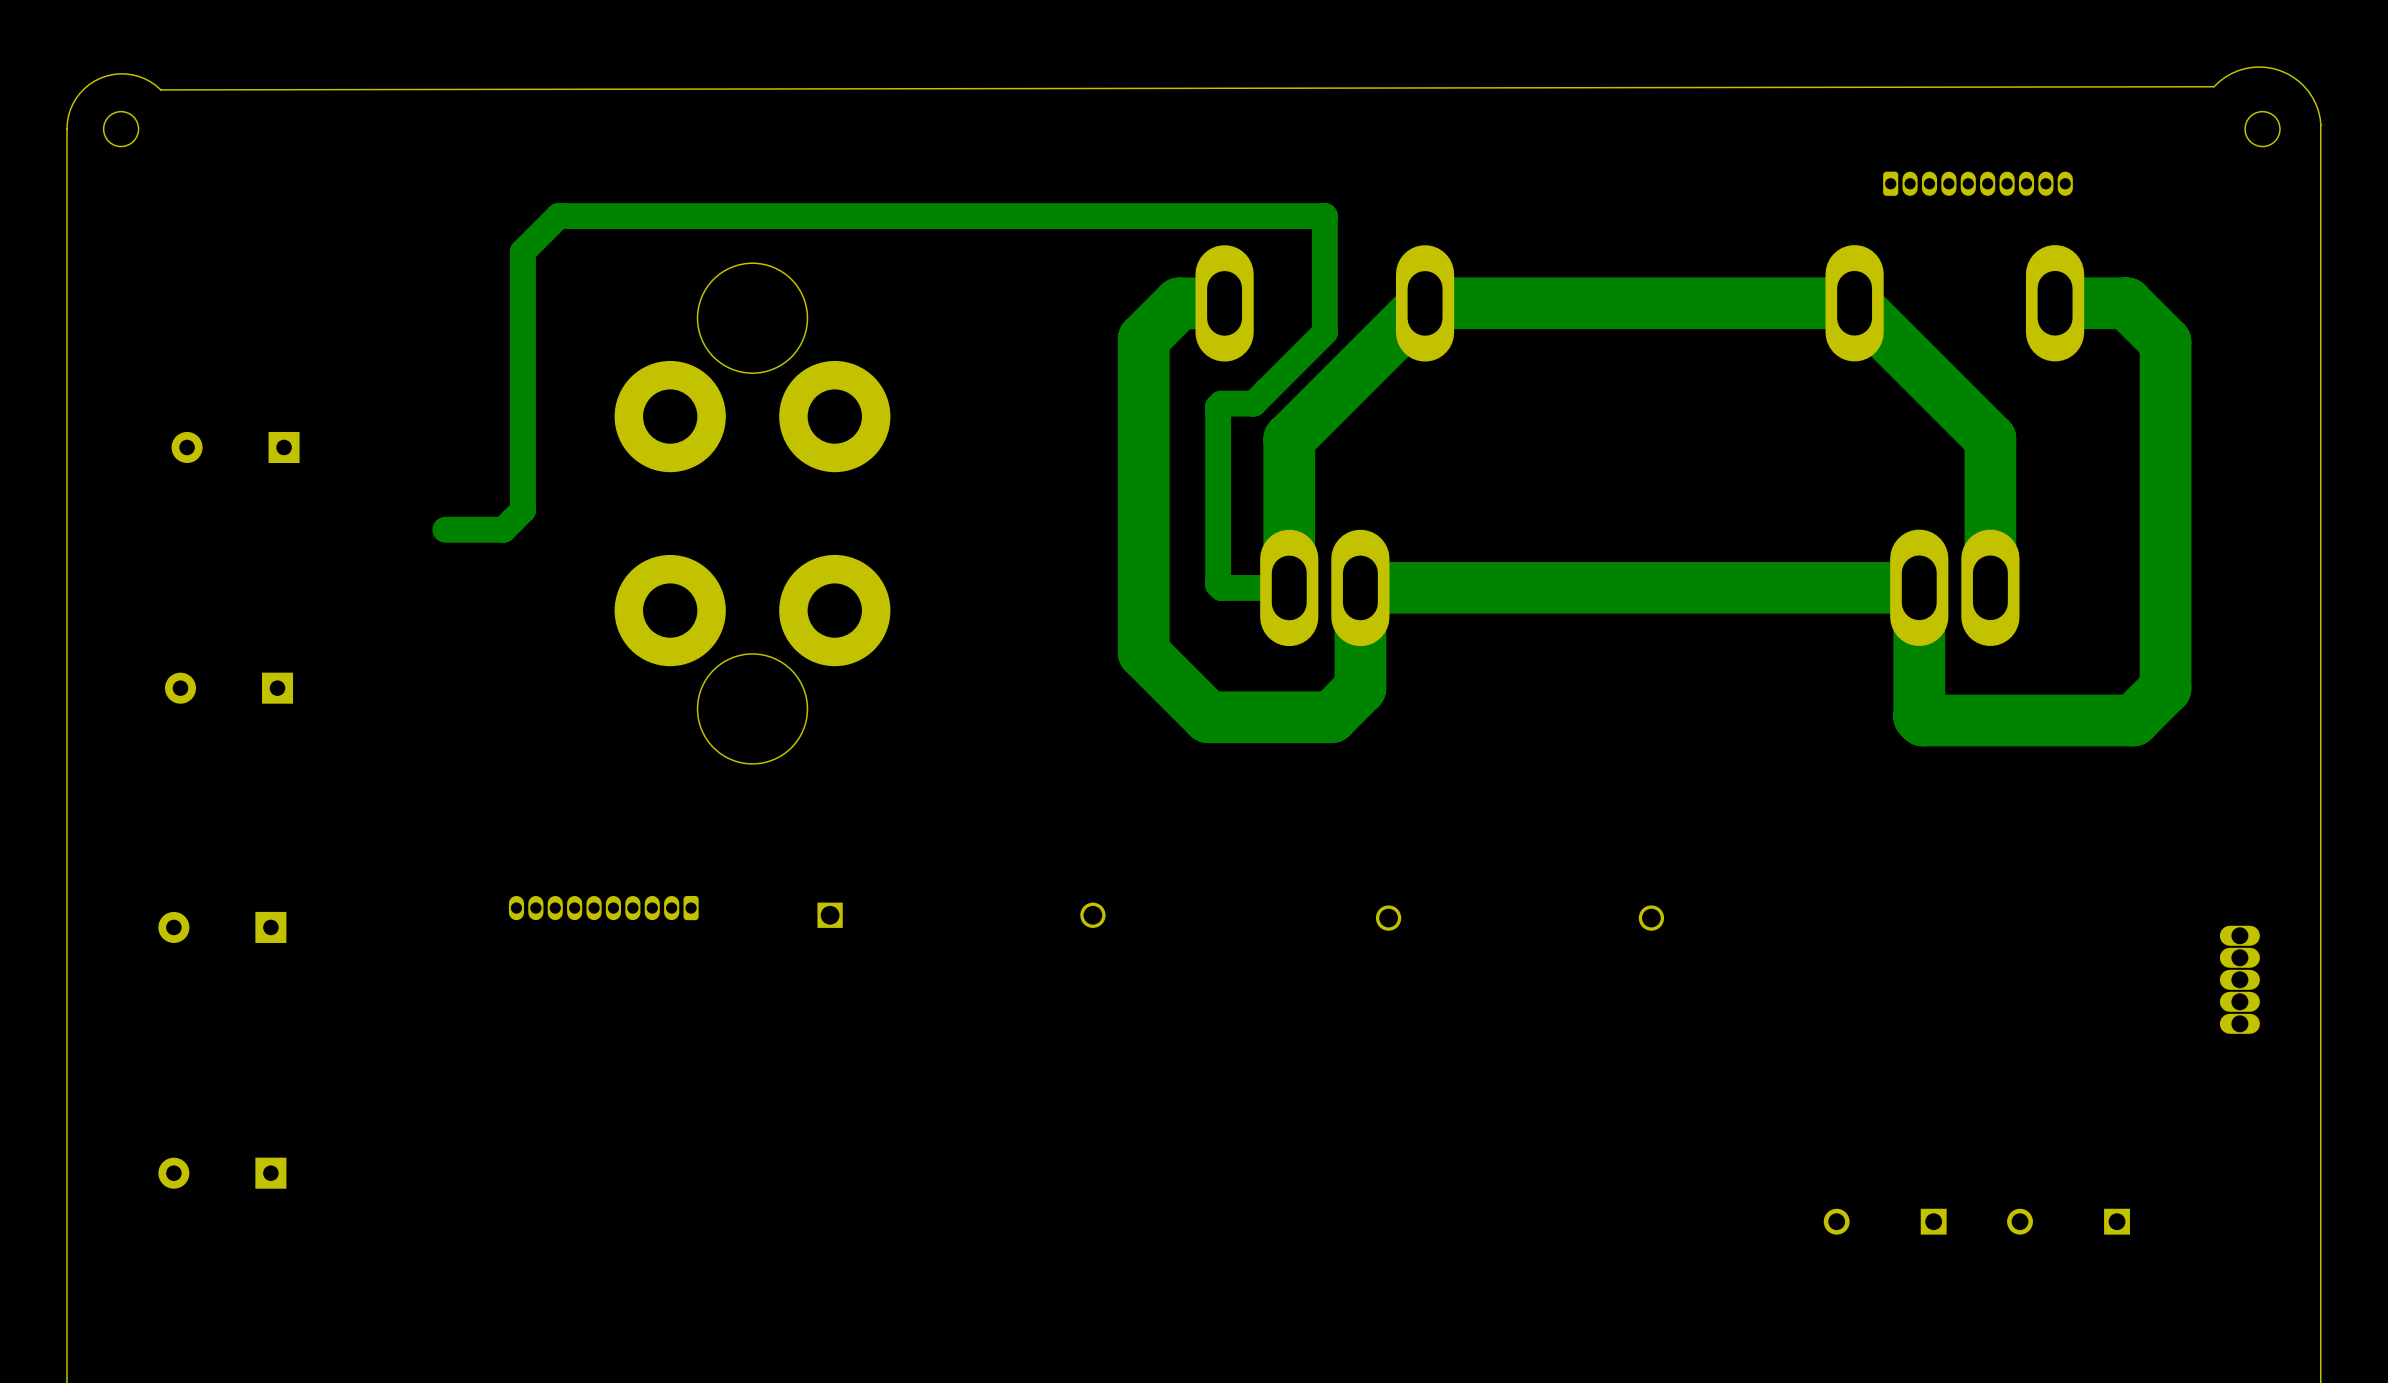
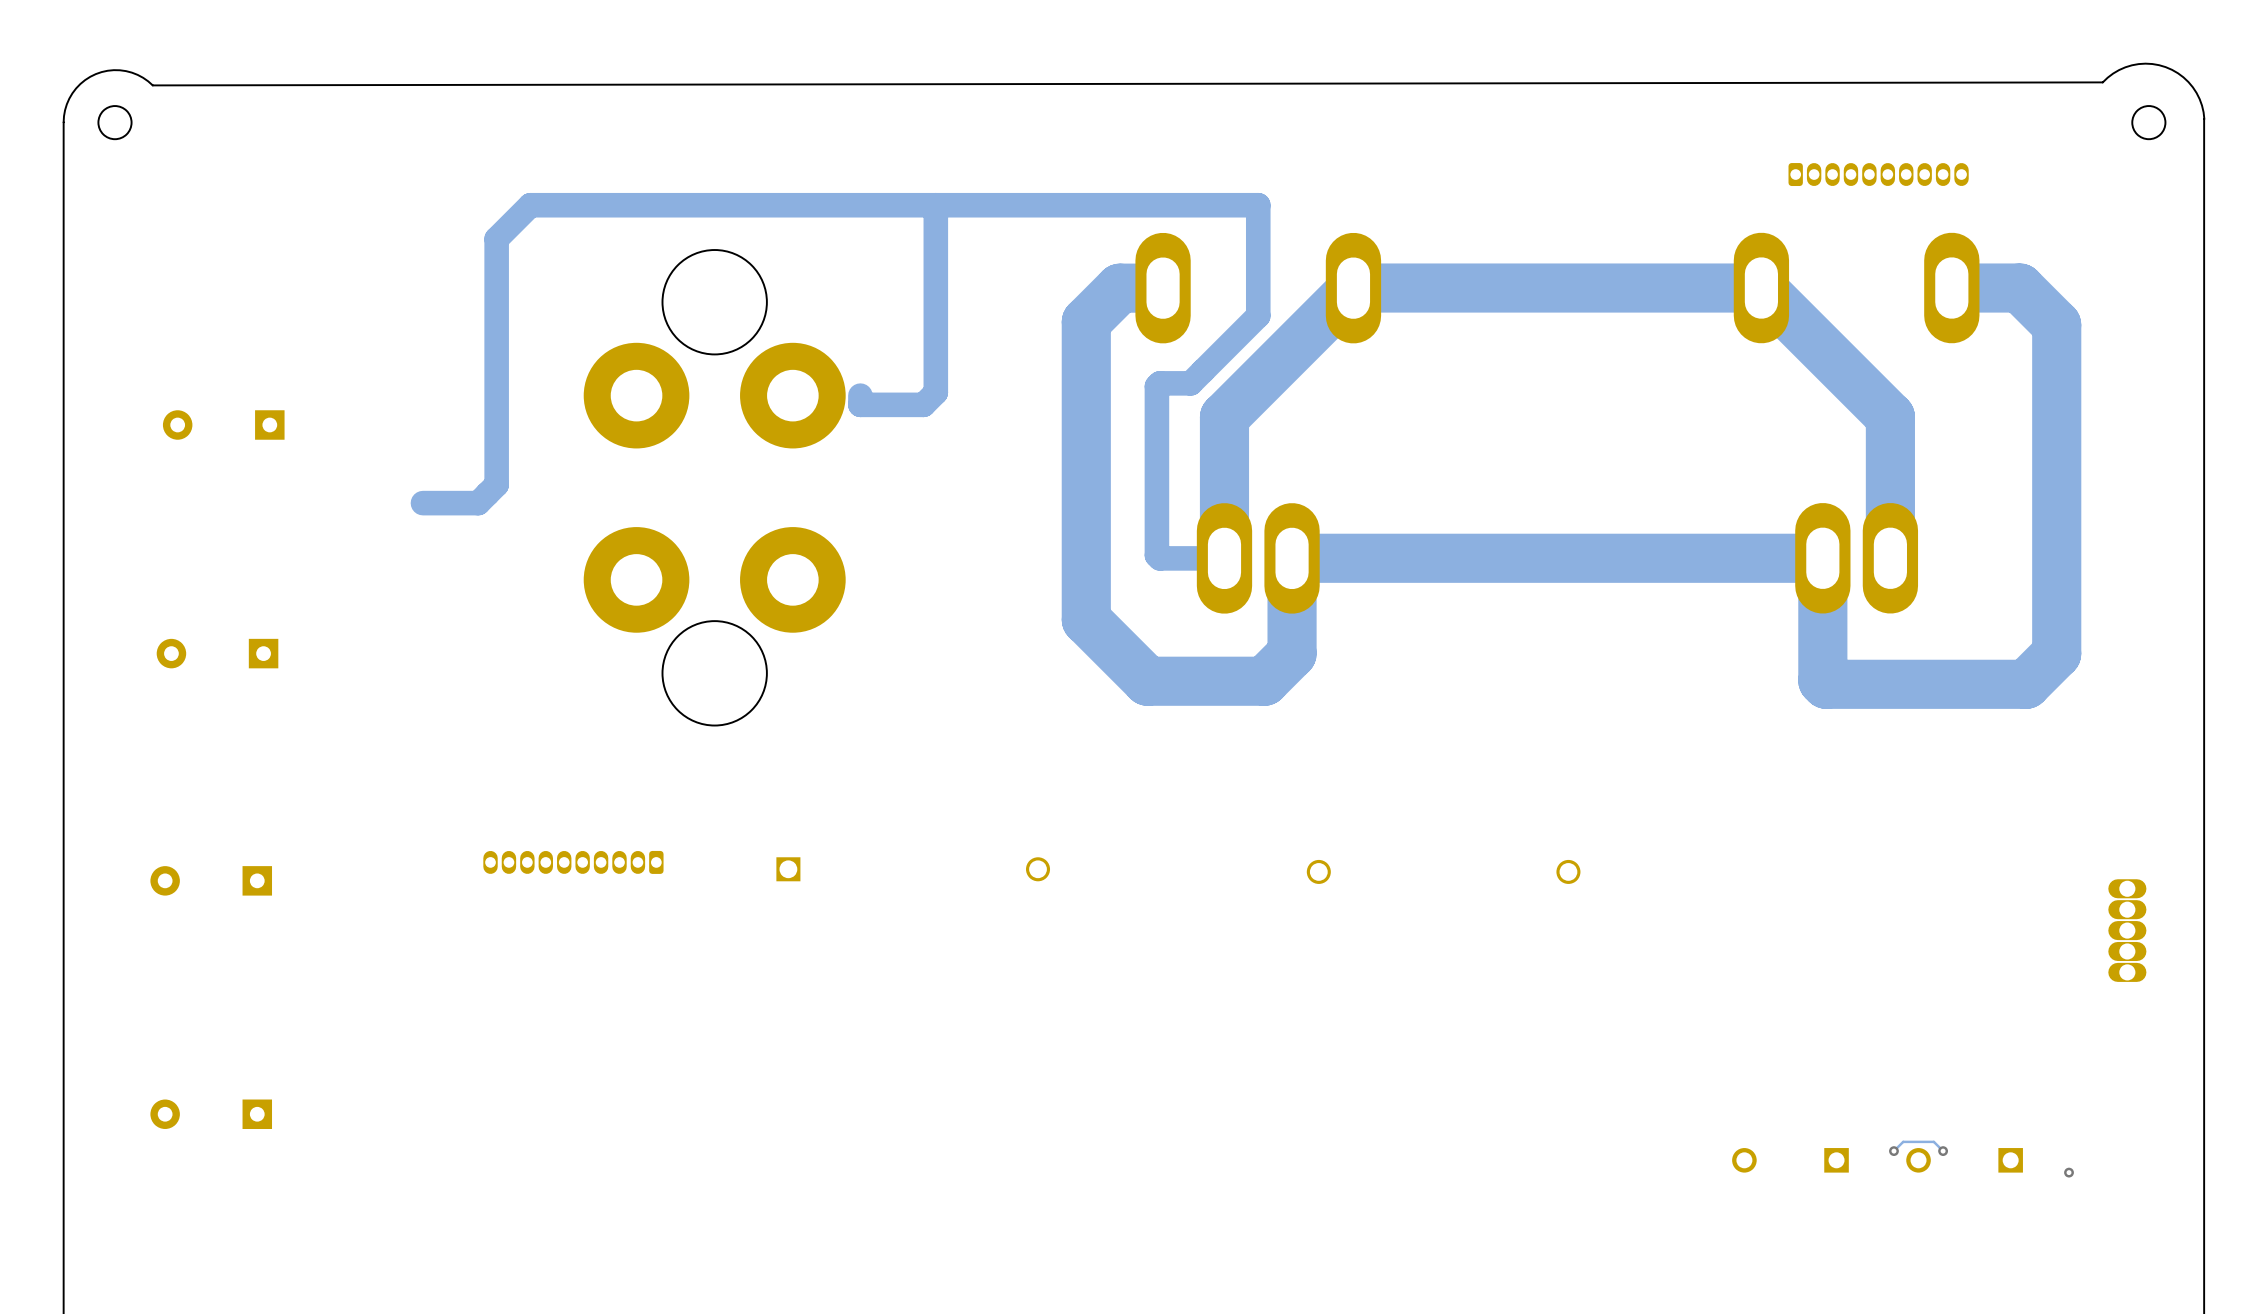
track: none -> (935, 205) (935, 392) (923, 404) (860, 404) (860, 395)
via: none -> (1893, 1151)
track: none -> (1943, 1151) (1940, 1151) (1940, 1148) (1933, 1141) (1903, 1141) (1893, 1151)
via: none -> (1943, 1151)
via: none -> (2069, 1172)

